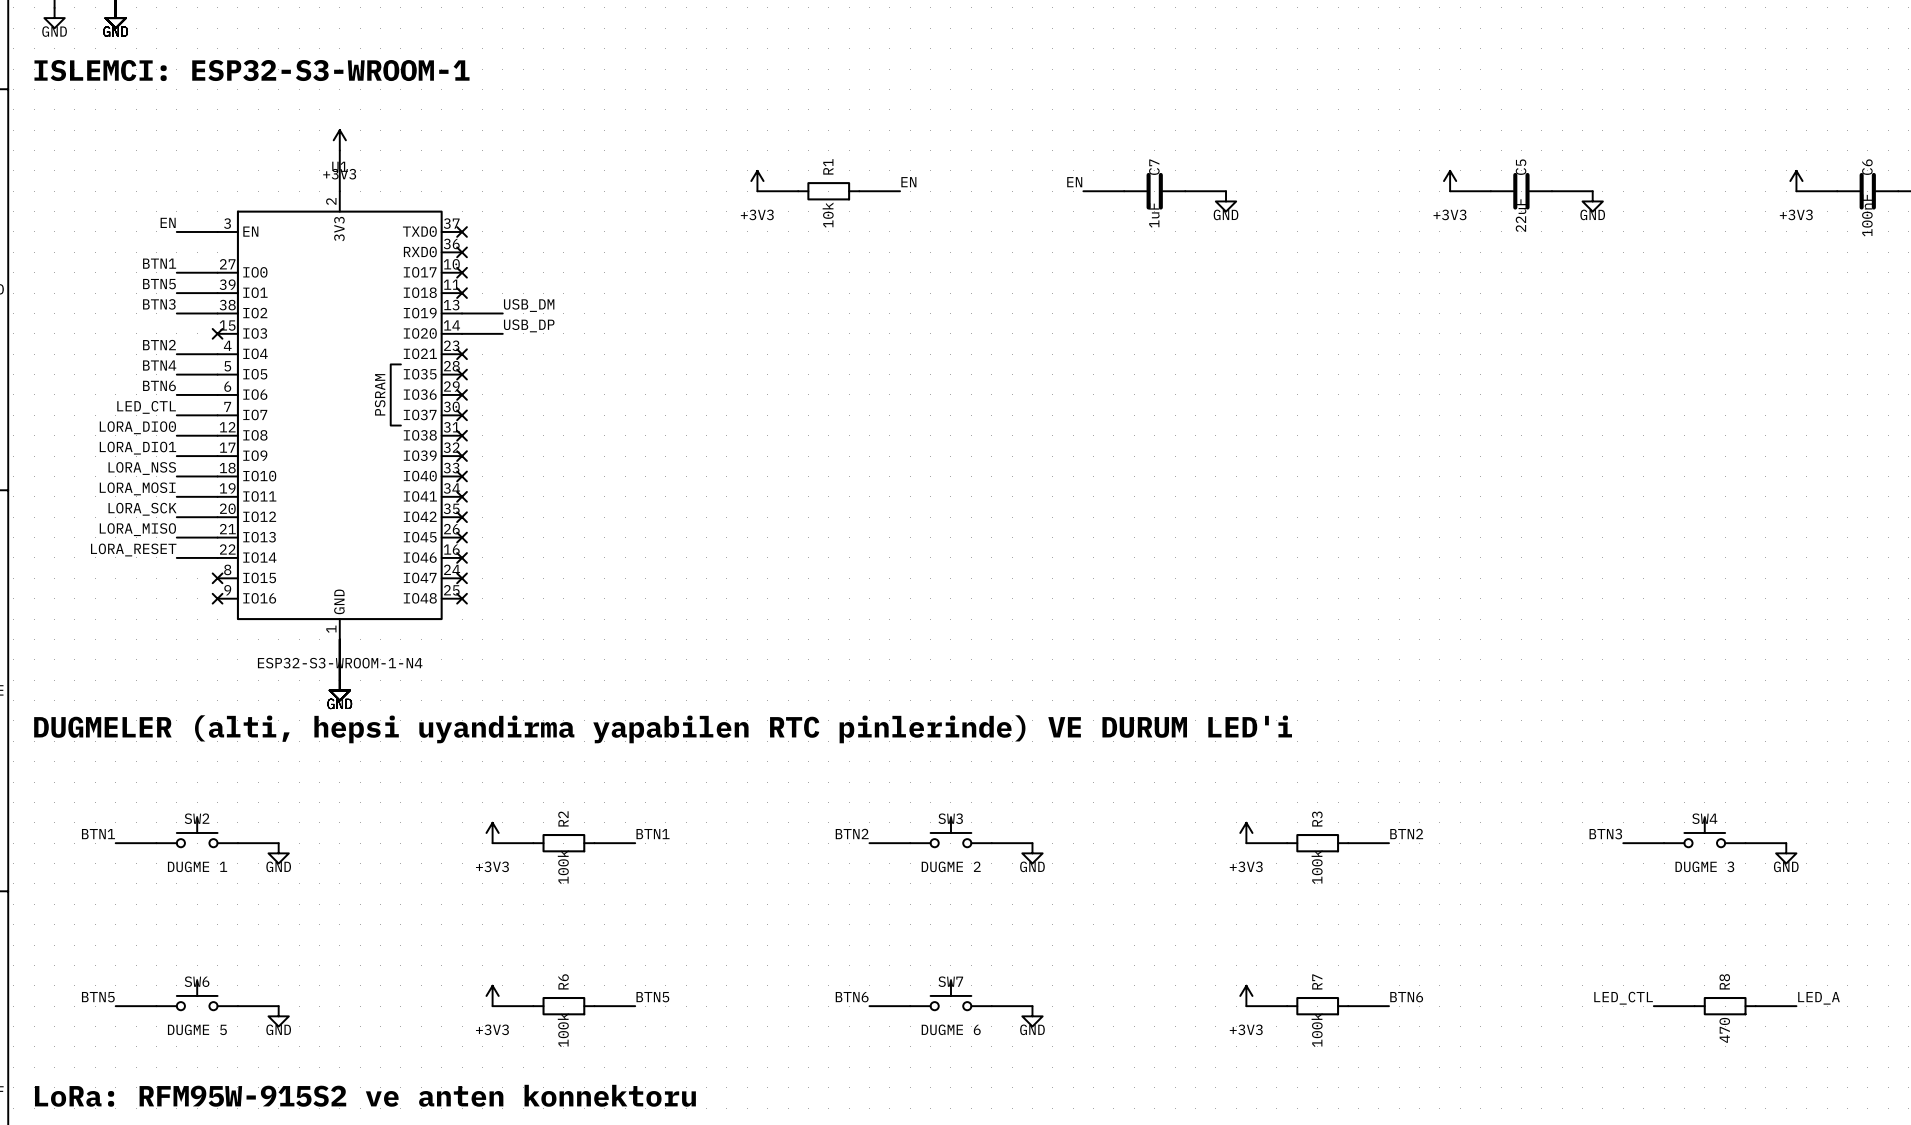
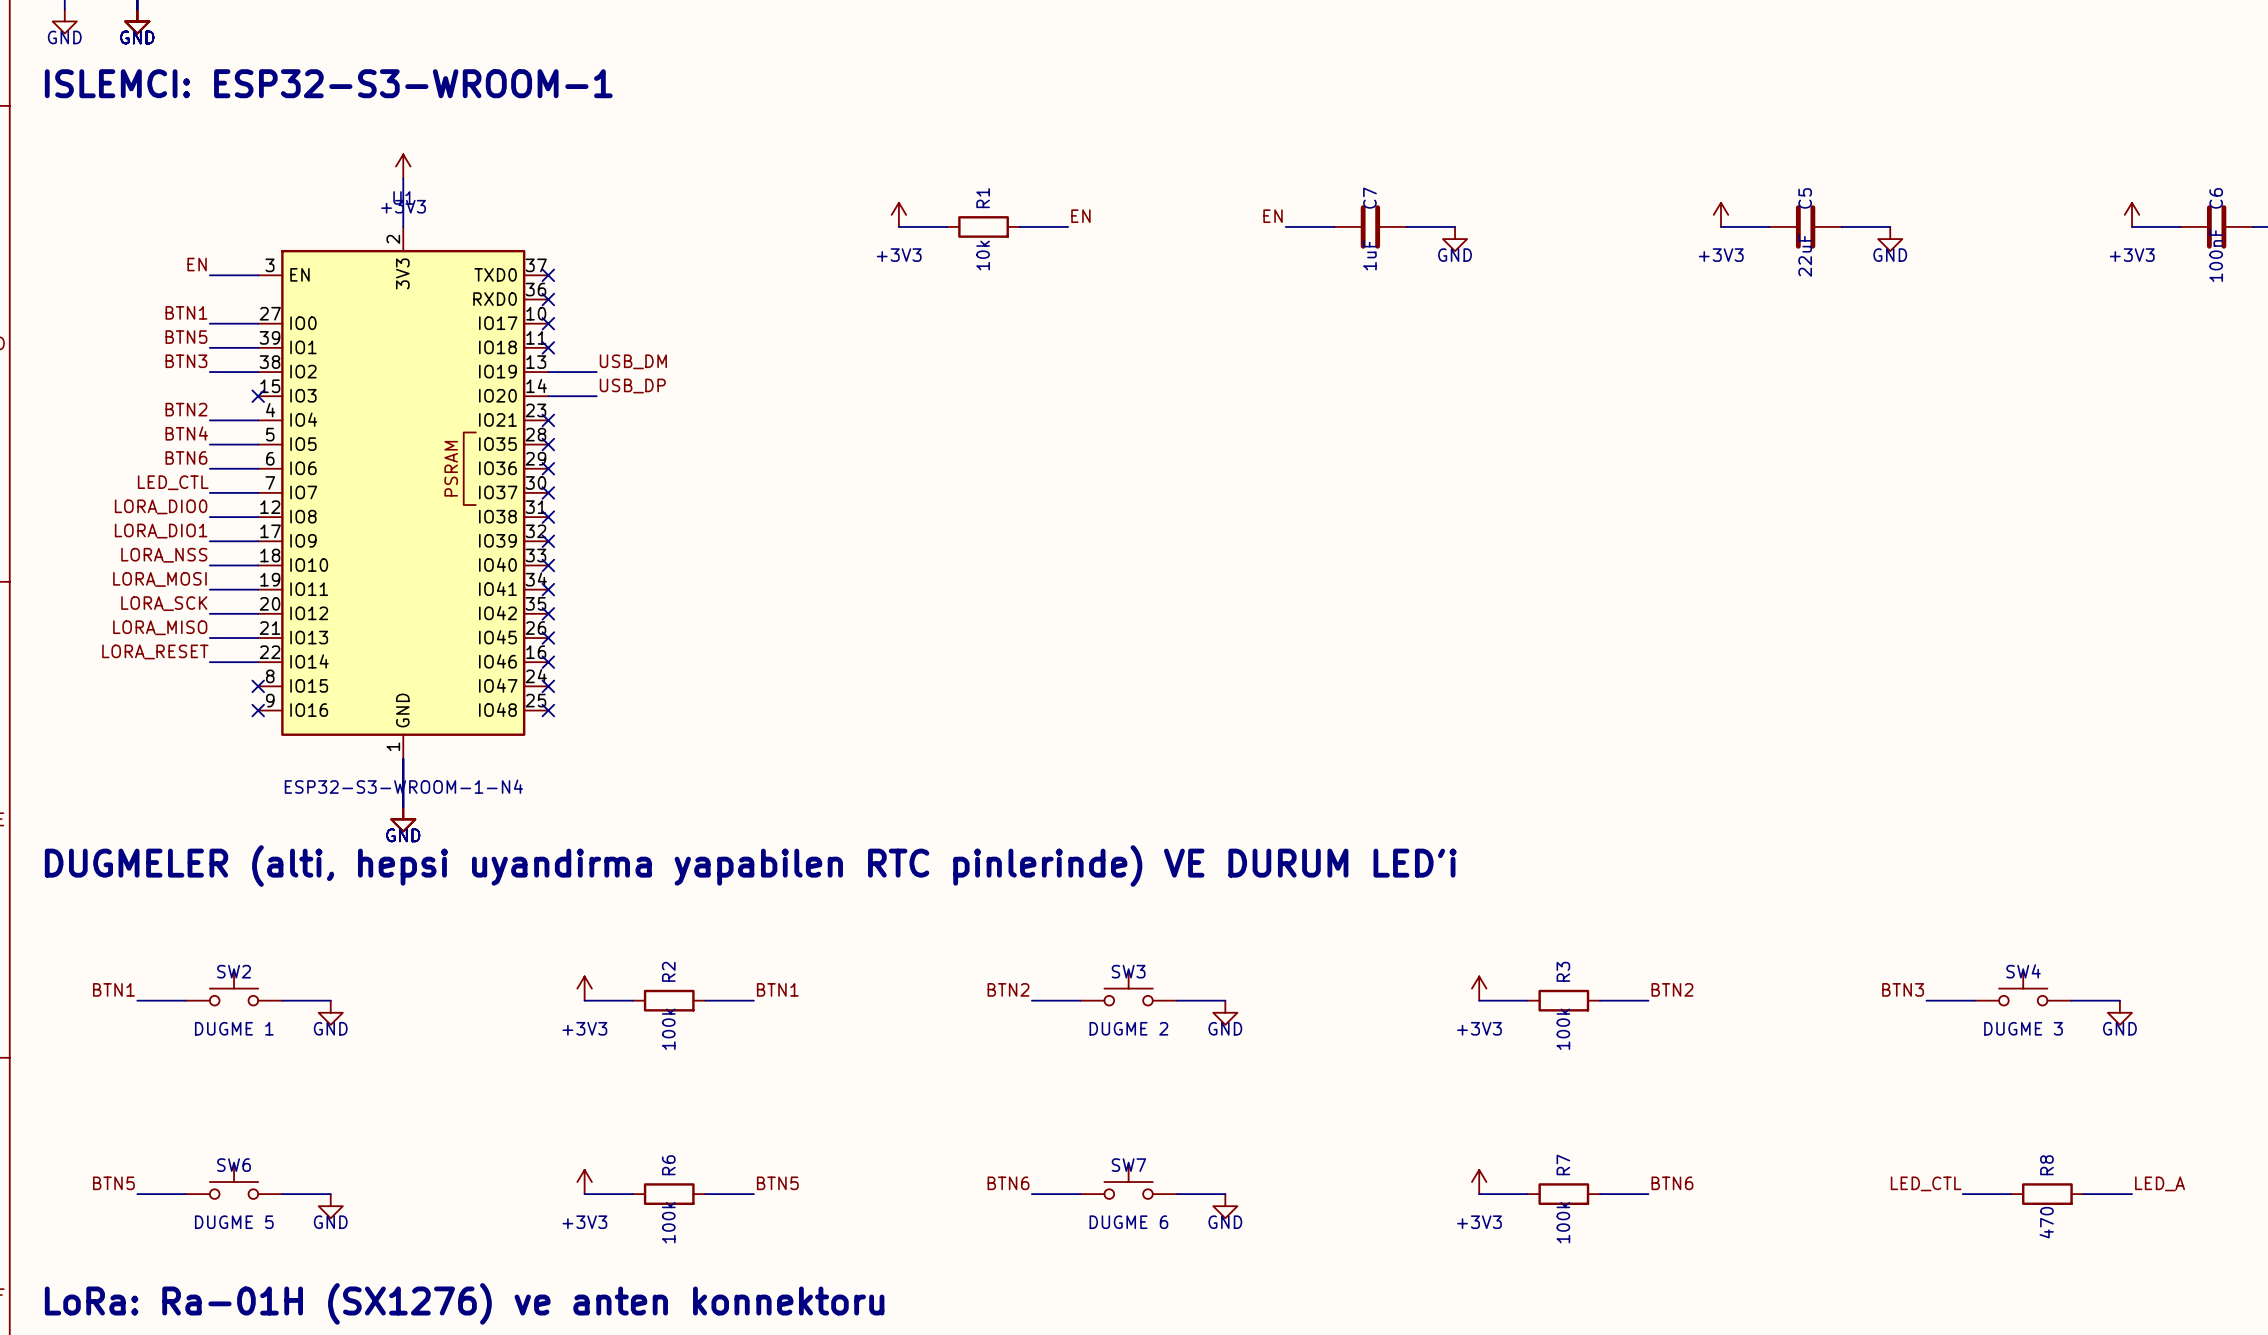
text: LoRa: RFM95W-915S2 ve anten konnektoru (365, 1095) -> LoRa: Ra-01H (SX1276) ve anten konnektoru (464, 1303)

